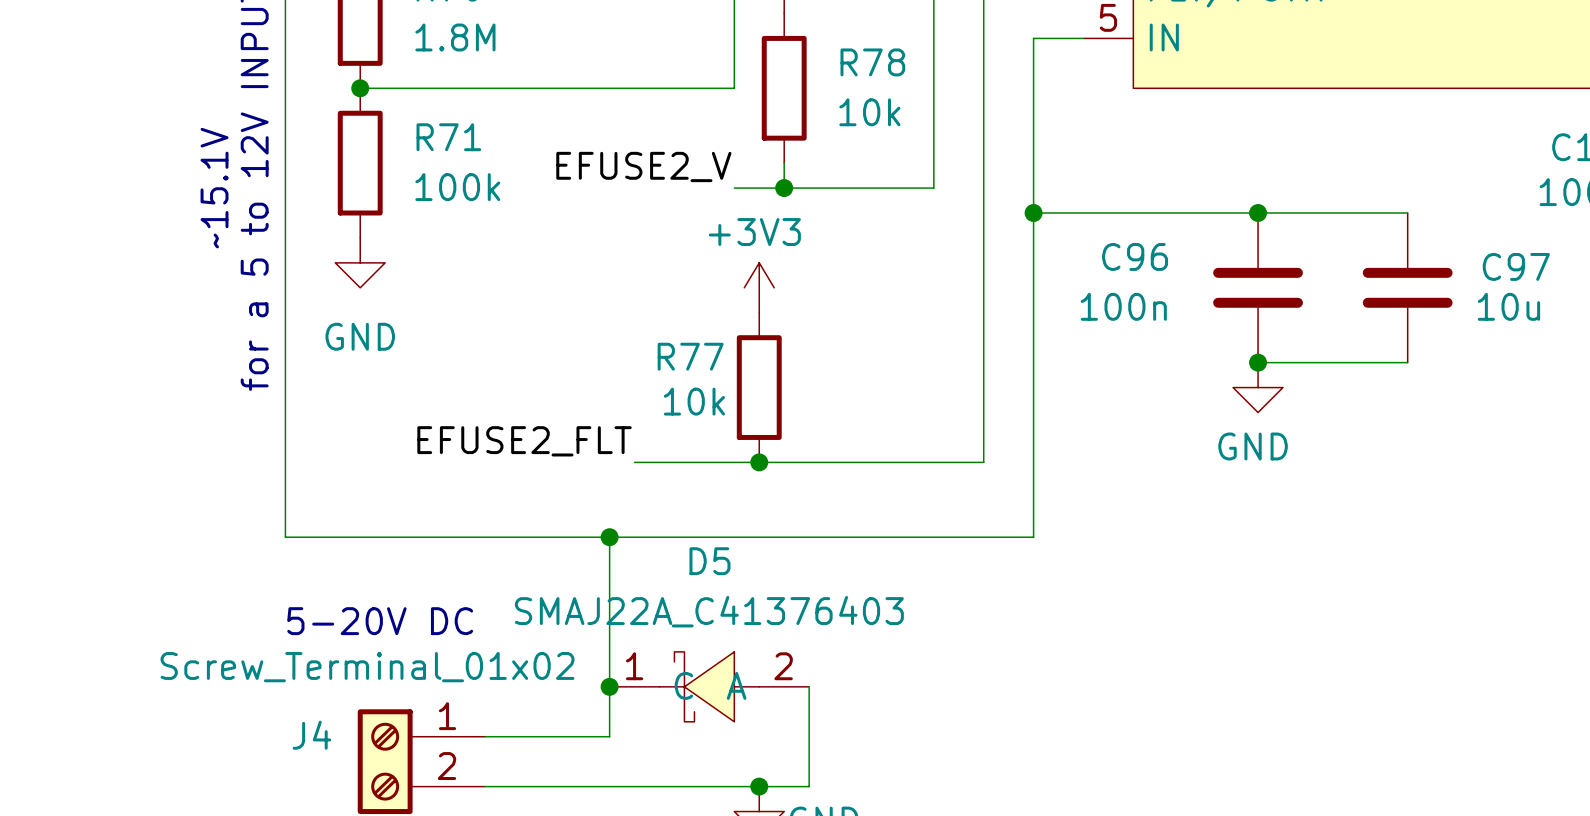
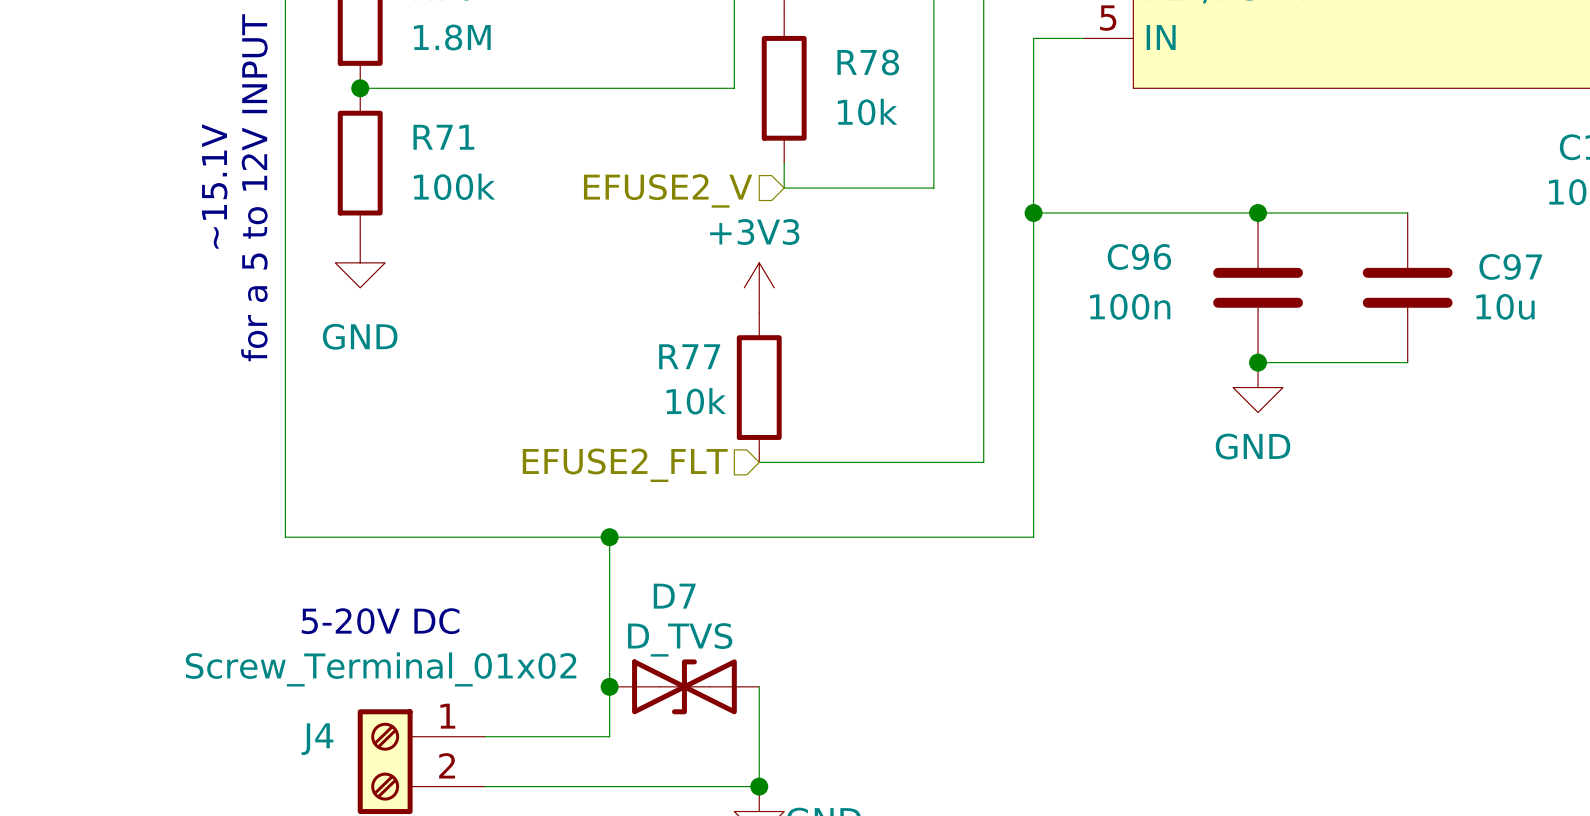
label: EFUSE2_V (643, 166) -> none
hierarchical label: none -> EFUSE2_V (668, 190)
wire: (734, 188) (784, 188) -> none
junction: (784, 188) -> none
label: EFUSE2_FLT (524, 441) -> none
hierarchical label: none -> EFUSE2_FLT (625, 465)
wire: (634, 462) (759, 462) -> none
junction: (759, 462) -> none
D7: none -> D_TVS (684, 686)
D5: SMAJ22A_C41376403 (709, 686) -> none
wire: (809, 686) (809, 786) (759, 786) -> (759, 686) (759, 786)

